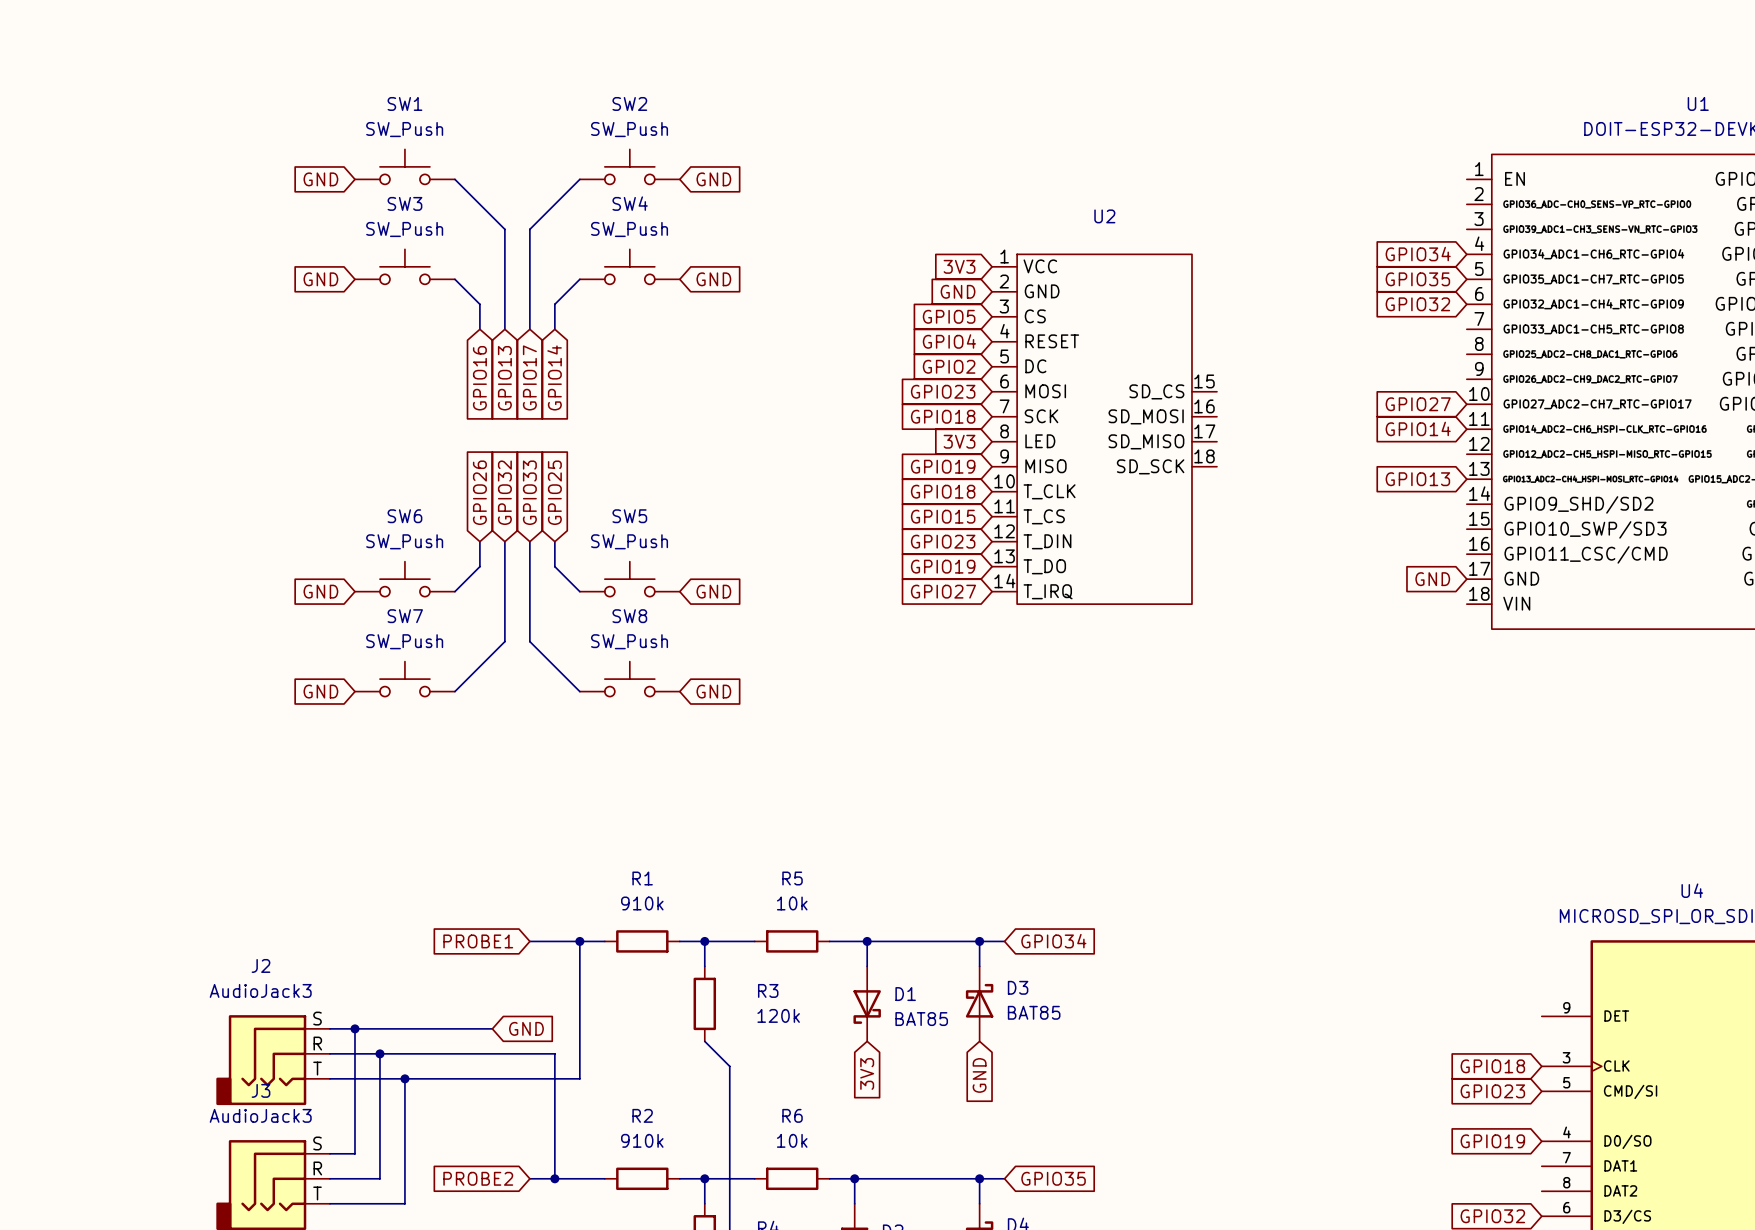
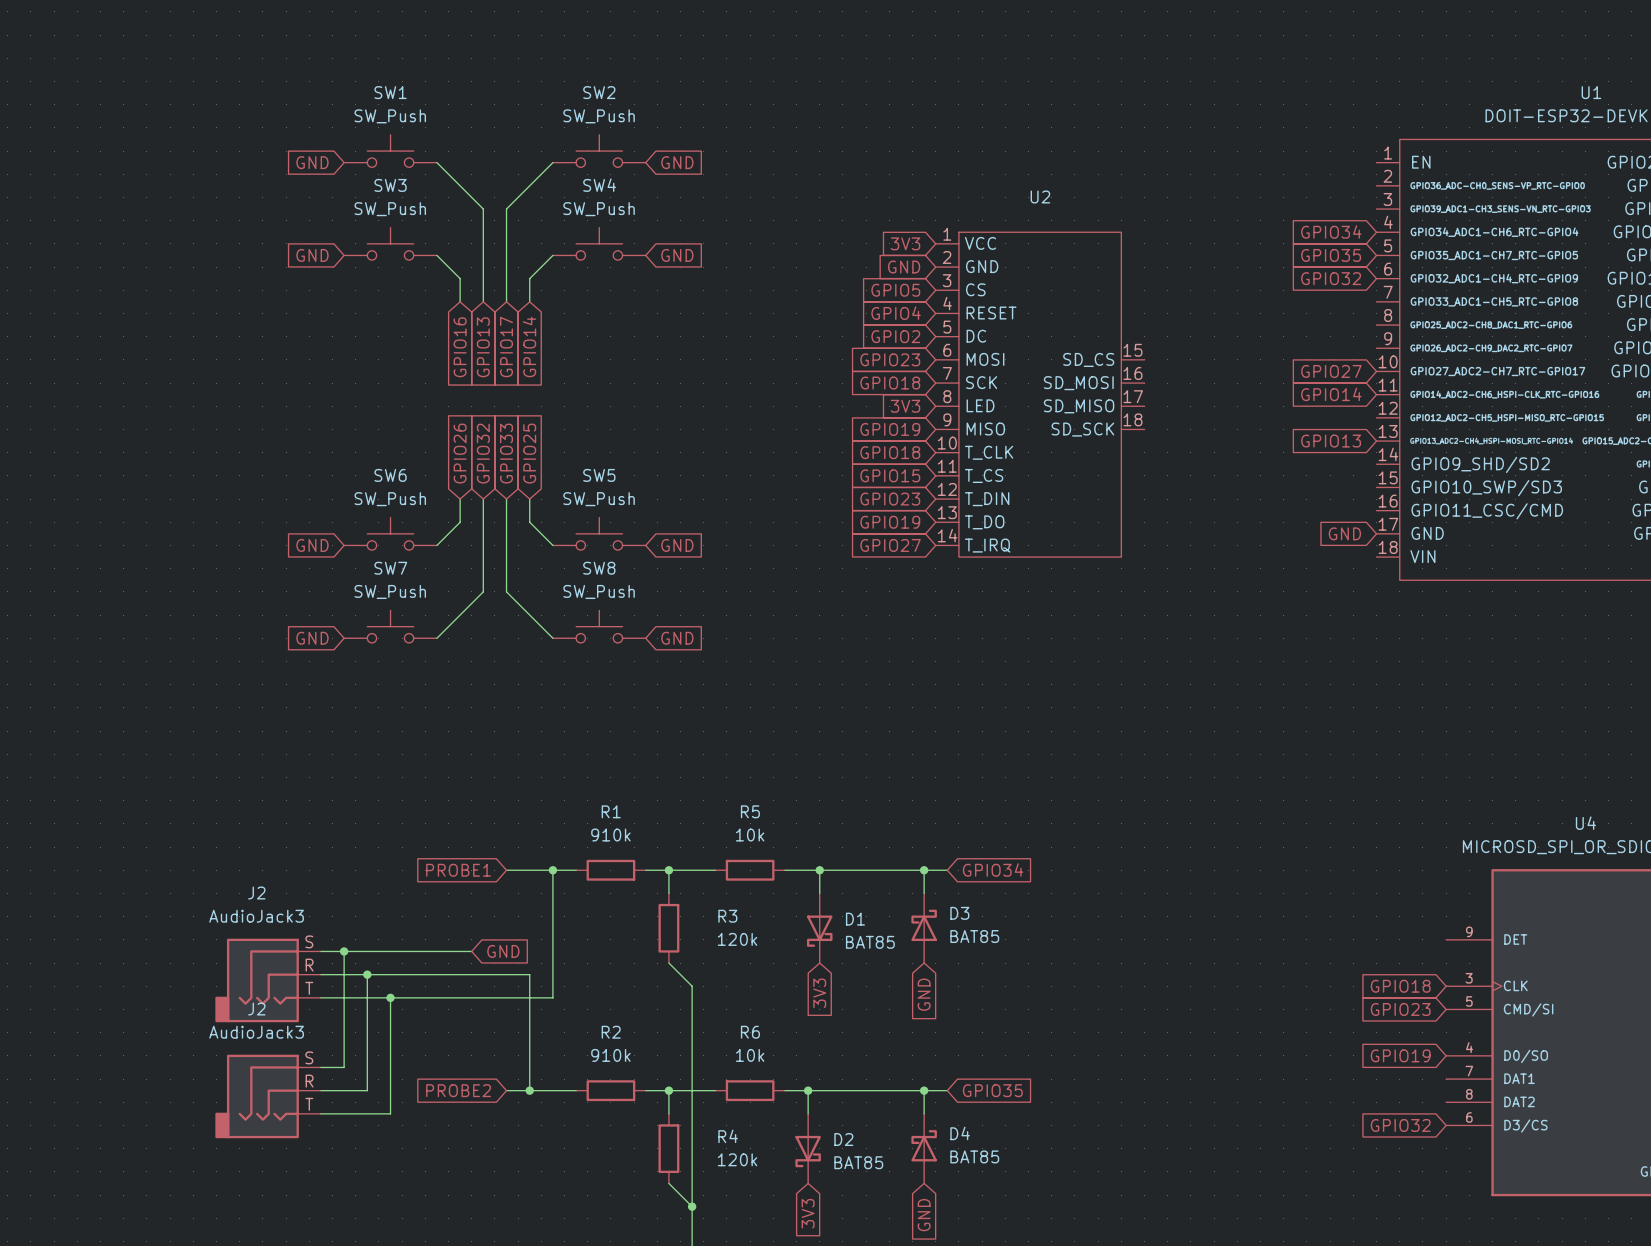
J3 name: J3 (260, 1090) -> J2 (256, 1009)

